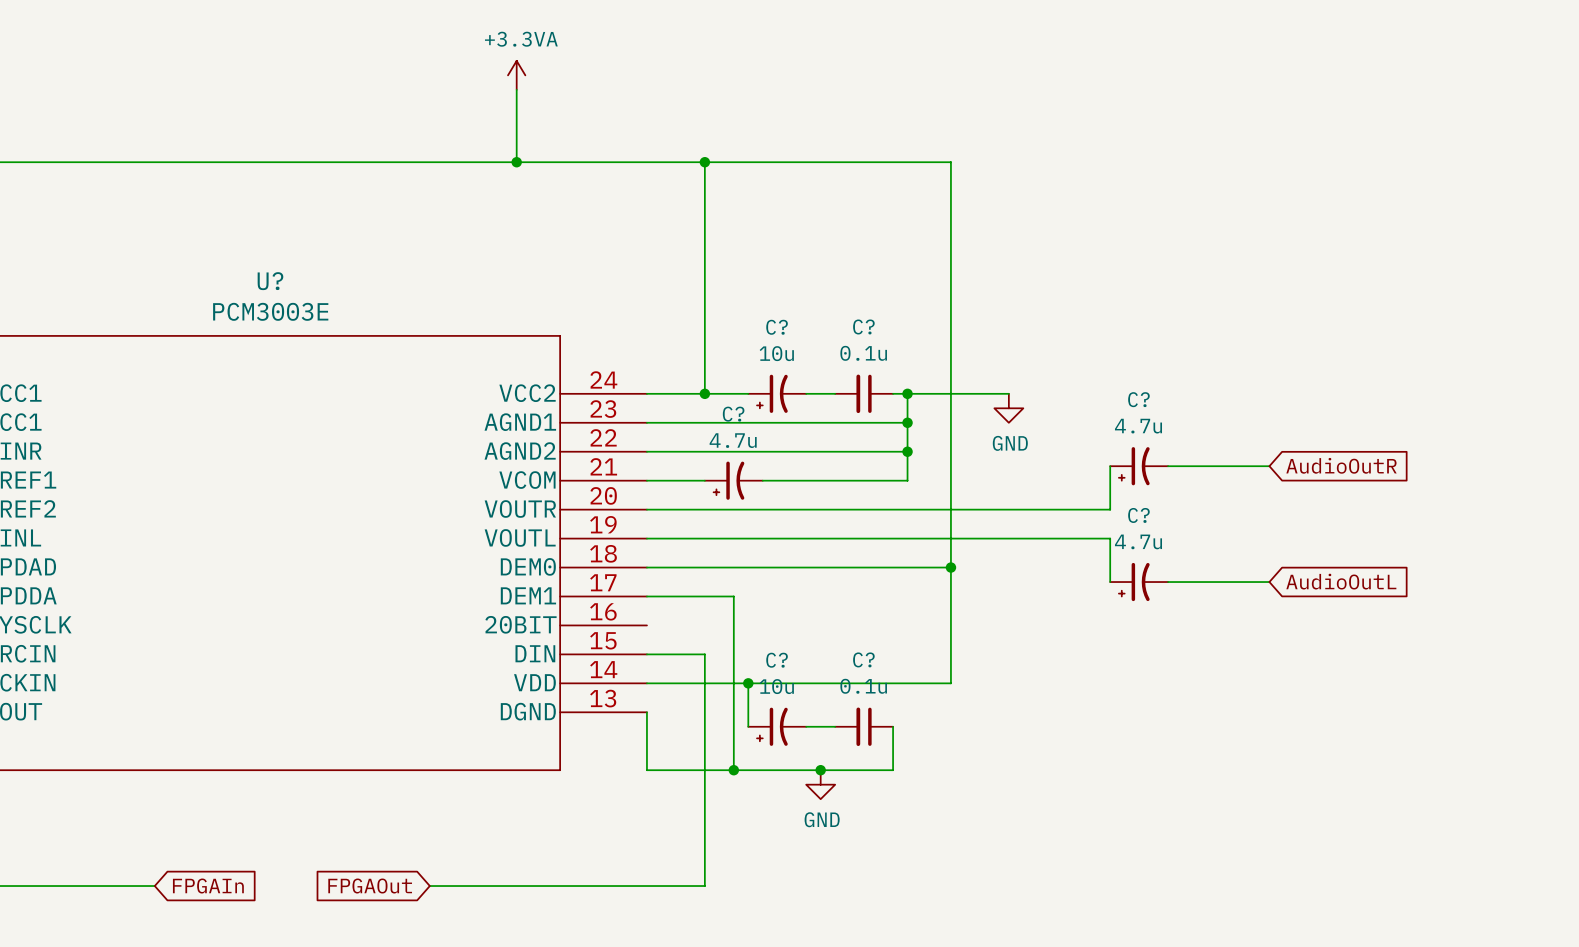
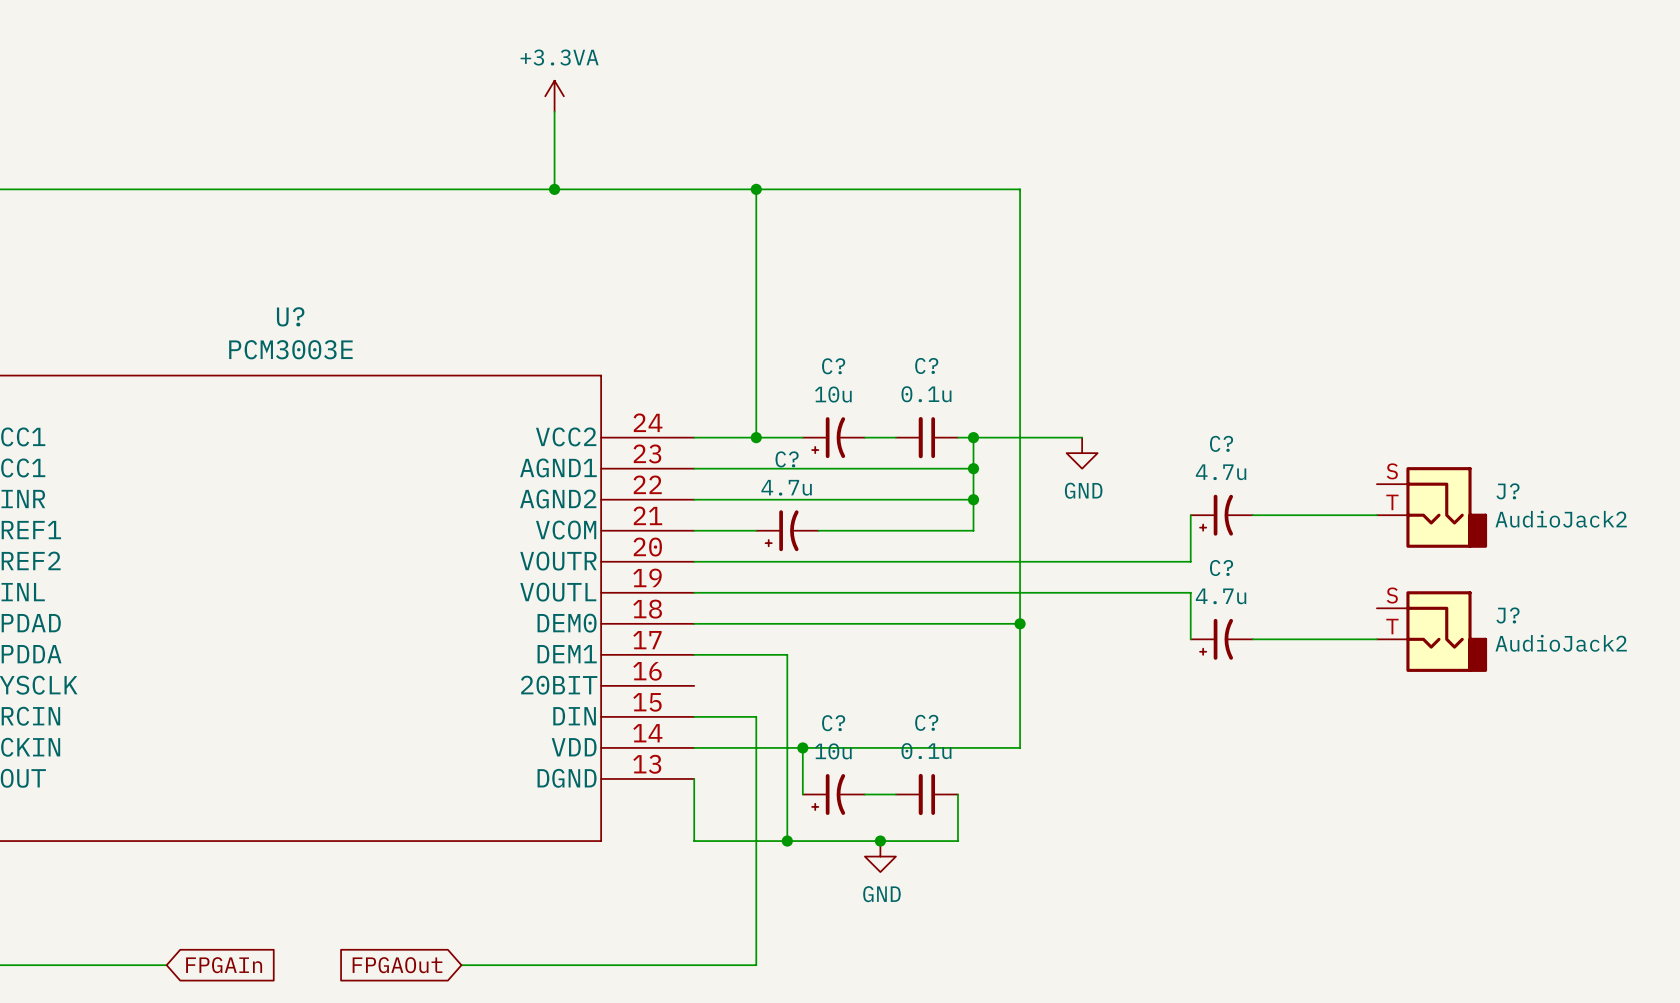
J?: none -> AudioJack2 (1432, 507)
global label: AudioOutR (1341, 465) -> none
wire: none -> (1361, 515) (1376, 515)
J?: none -> AudioJack2 (1432, 631)
global label: AudioOutL (1341, 581) -> none
wire: none -> (1361, 639) (1376, 639)

